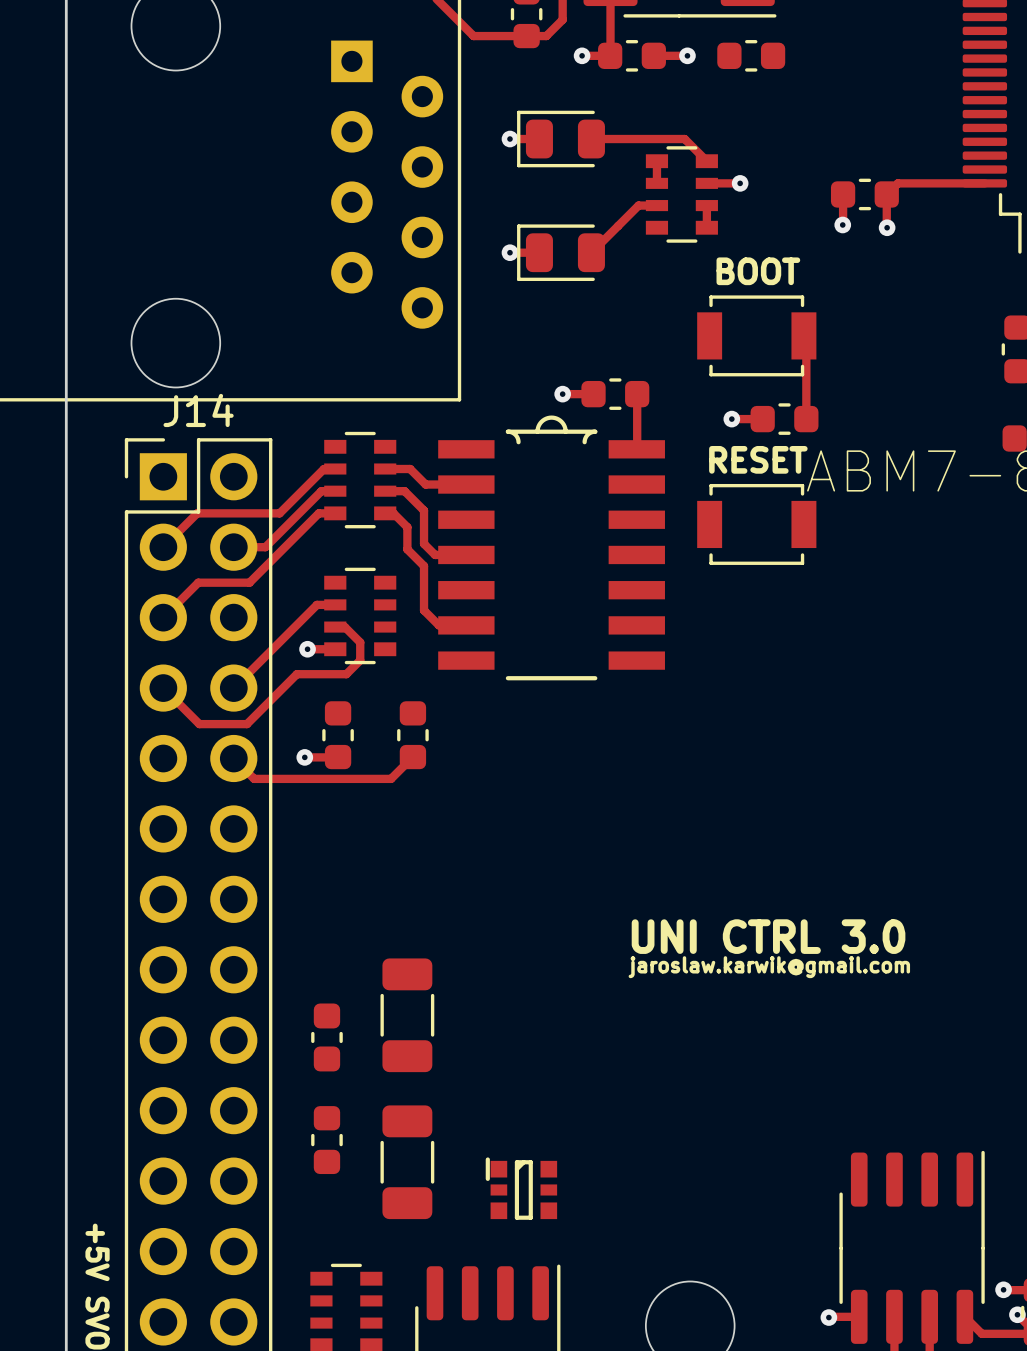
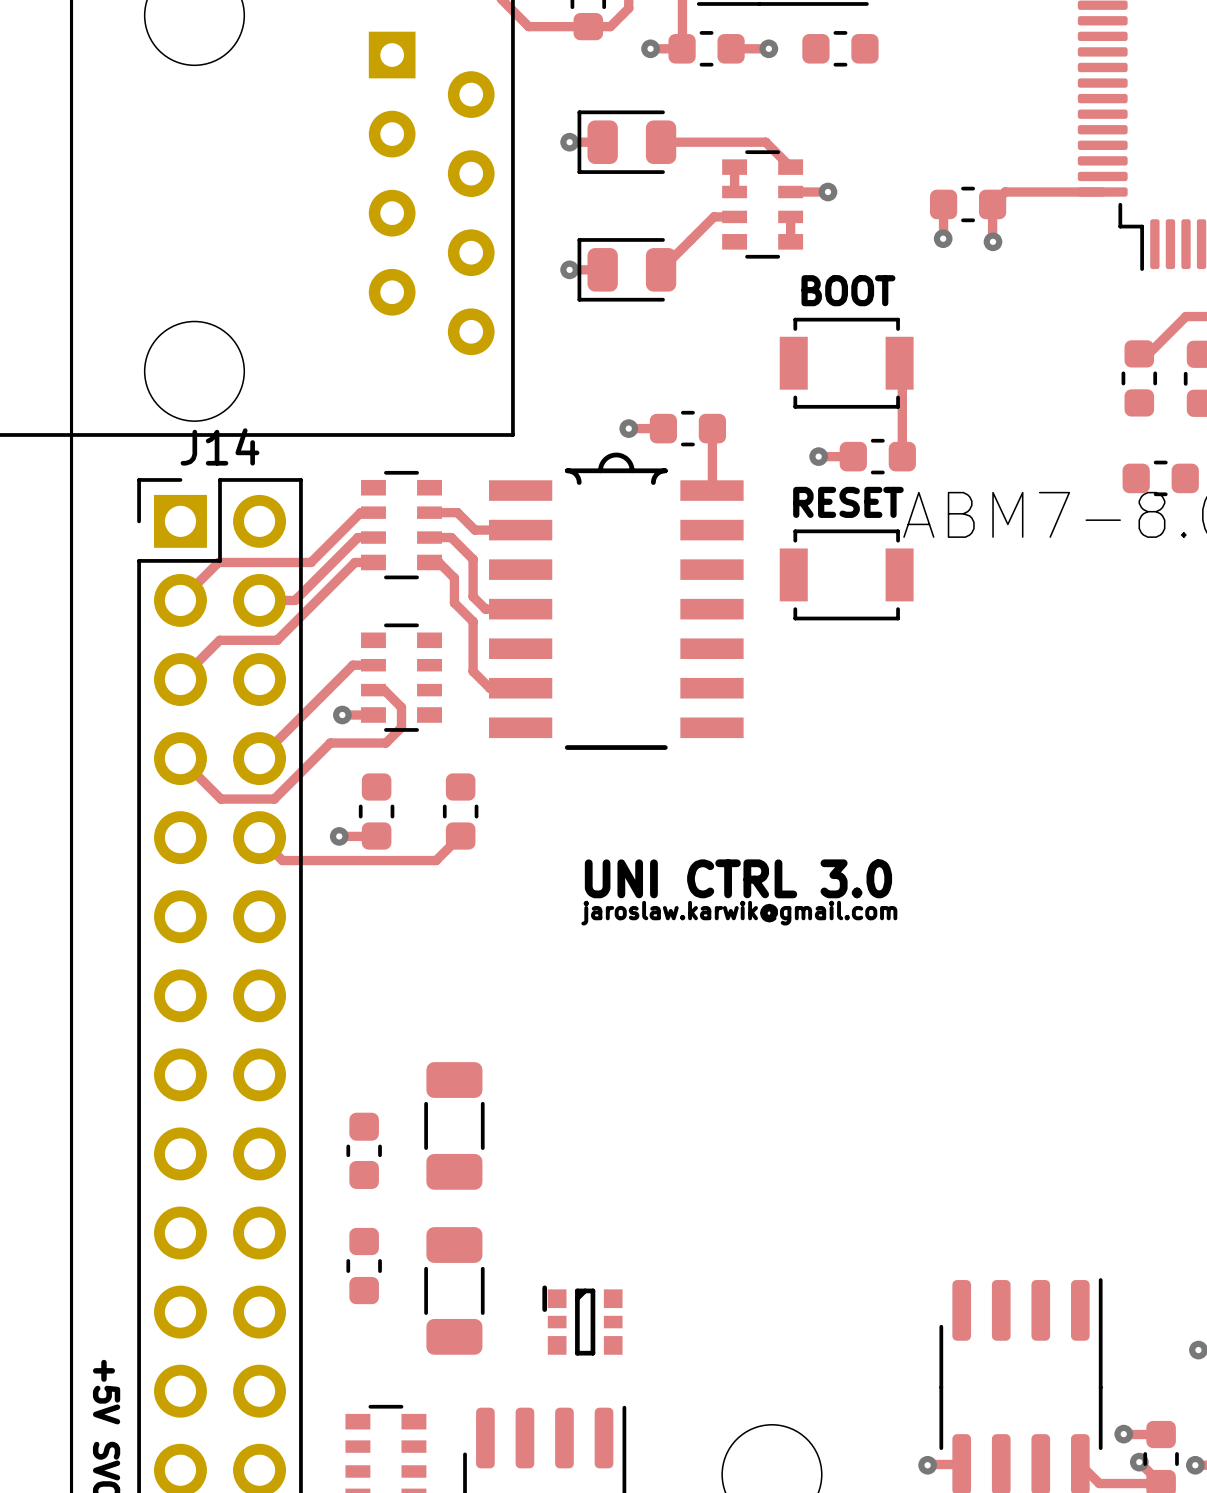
text position: UNI CTRL 3.0 (768, 936) -> UNI CTRL 3.0 (738, 878)
text position: jaroslaw.karwik@gmail.com (769, 967) -> jaroslaw.karwik@gmail.com (739, 913)

